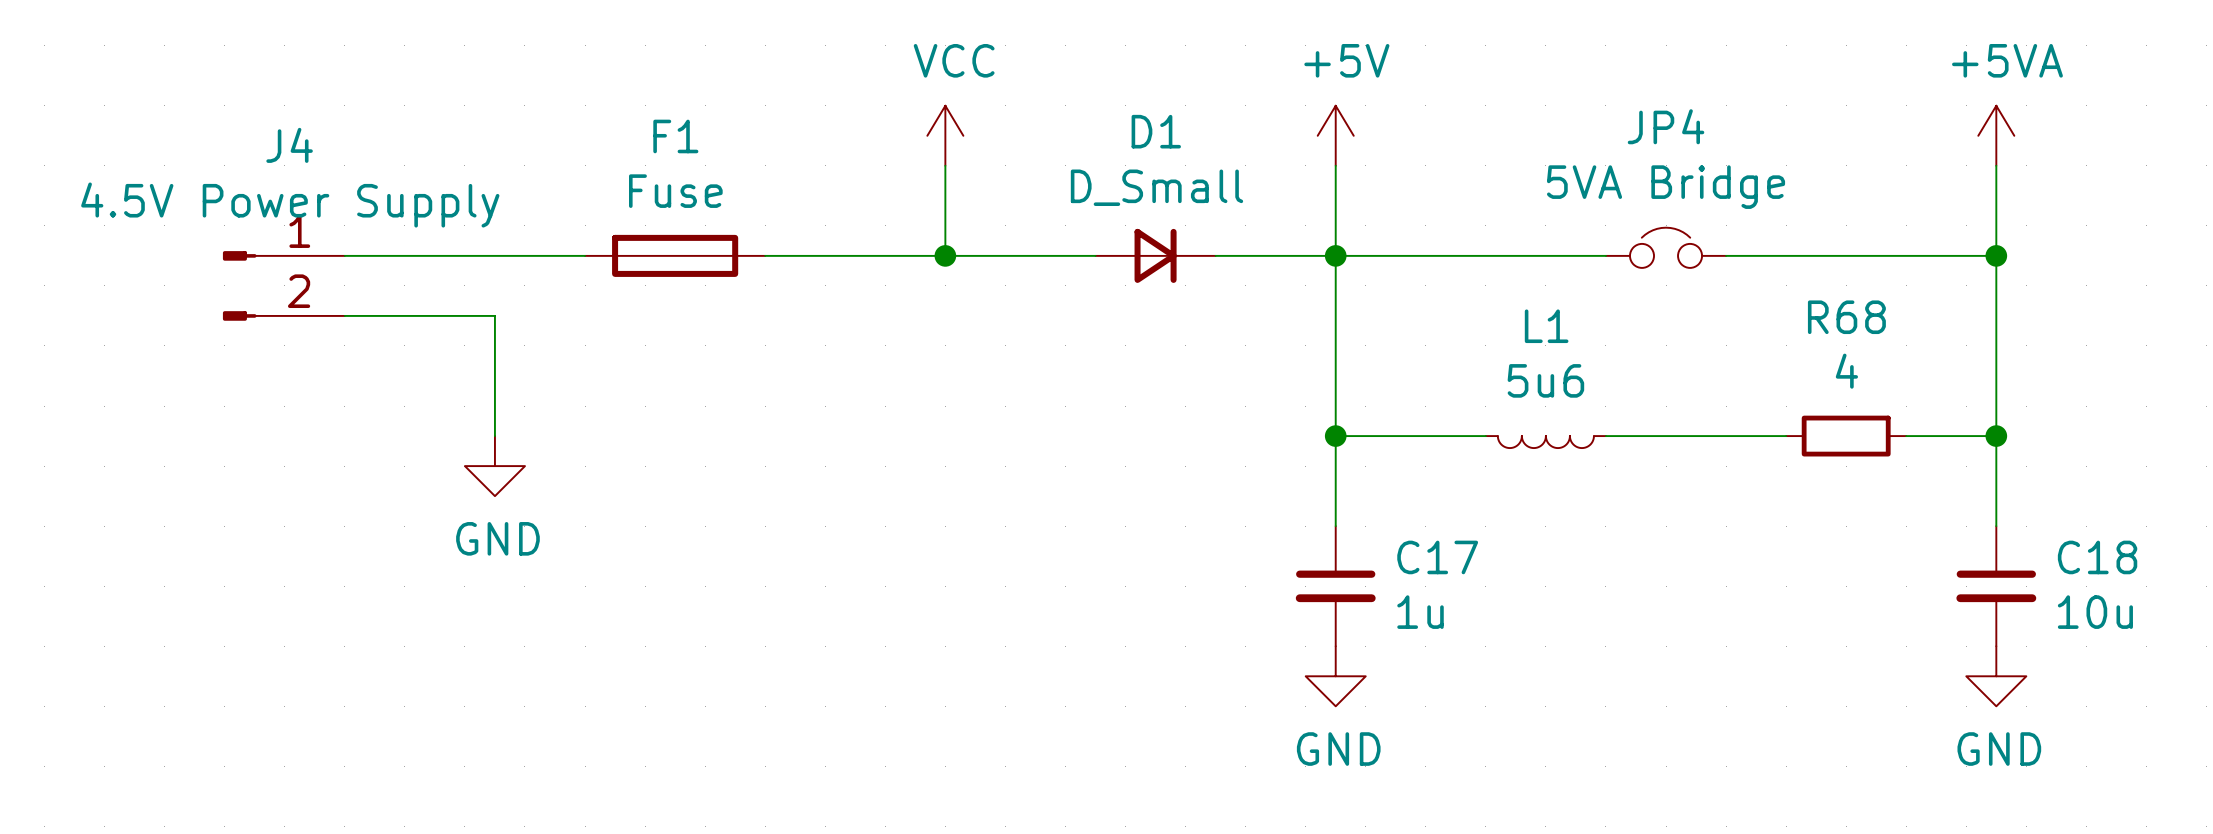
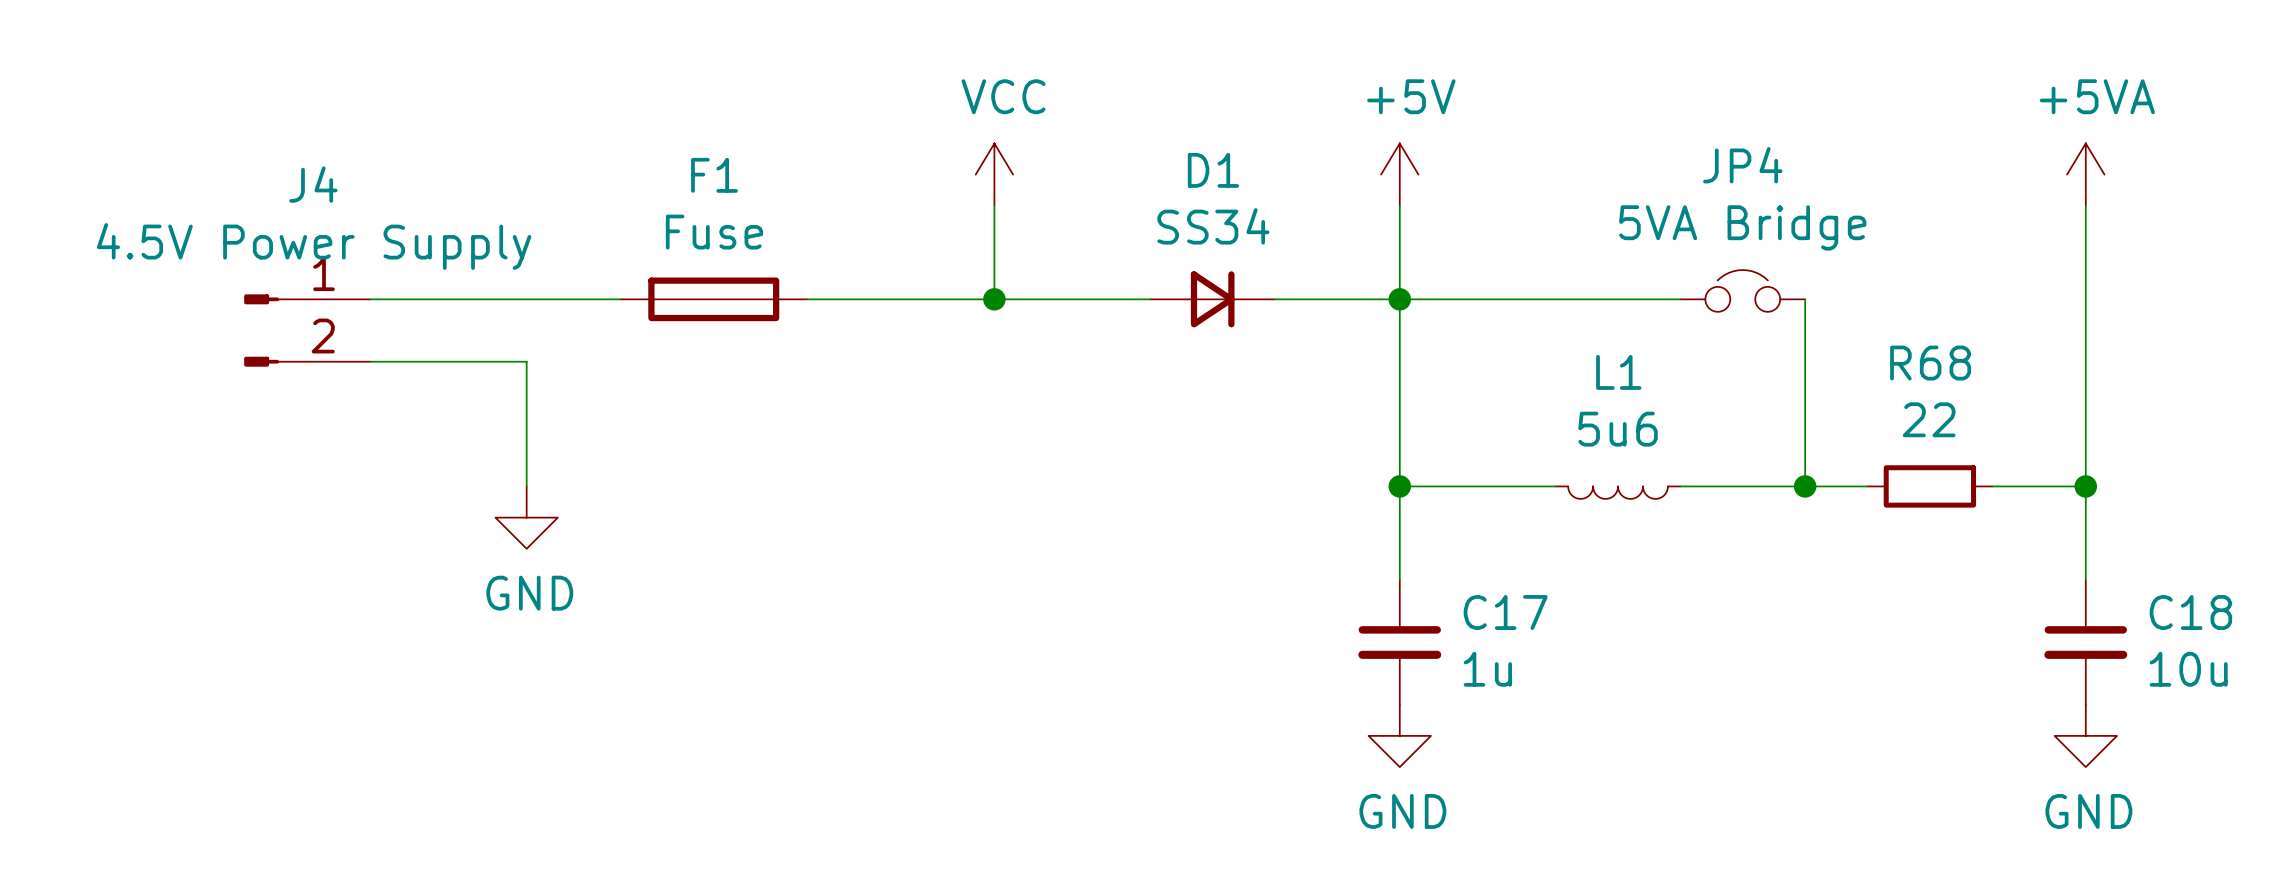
D1 value: D_Small (1156, 187) -> SS34 (1213, 226)
wire: (1726, 255) (1996, 255) -> (1805, 299) (1805, 486)
junction: (1996, 255) -> none
R68 value: 4 (1846, 371) -> 22 (1929, 419)
junction: none -> (1805, 486)

